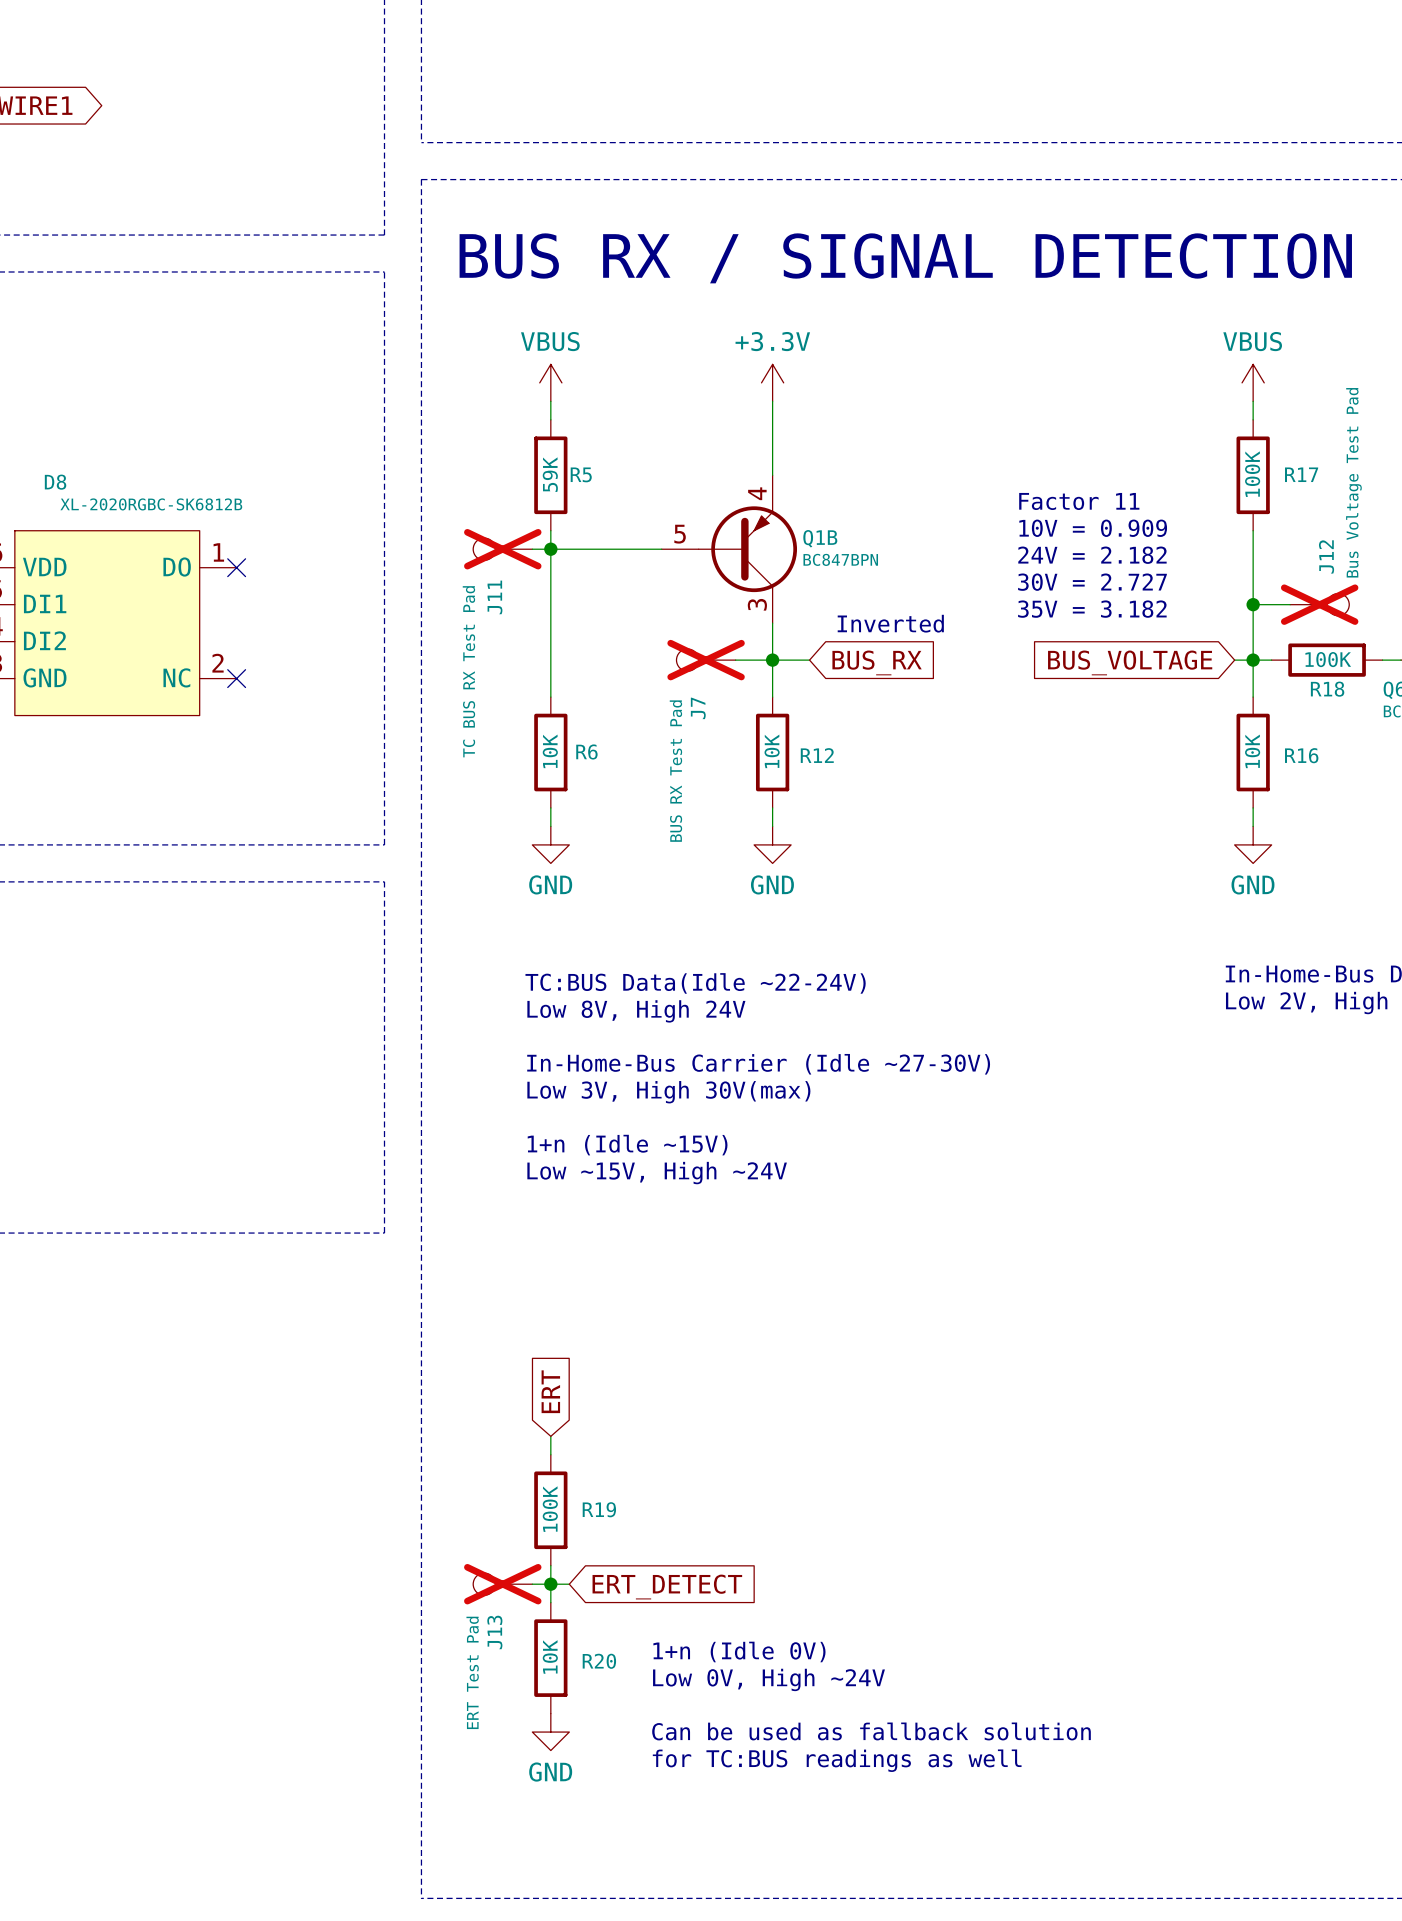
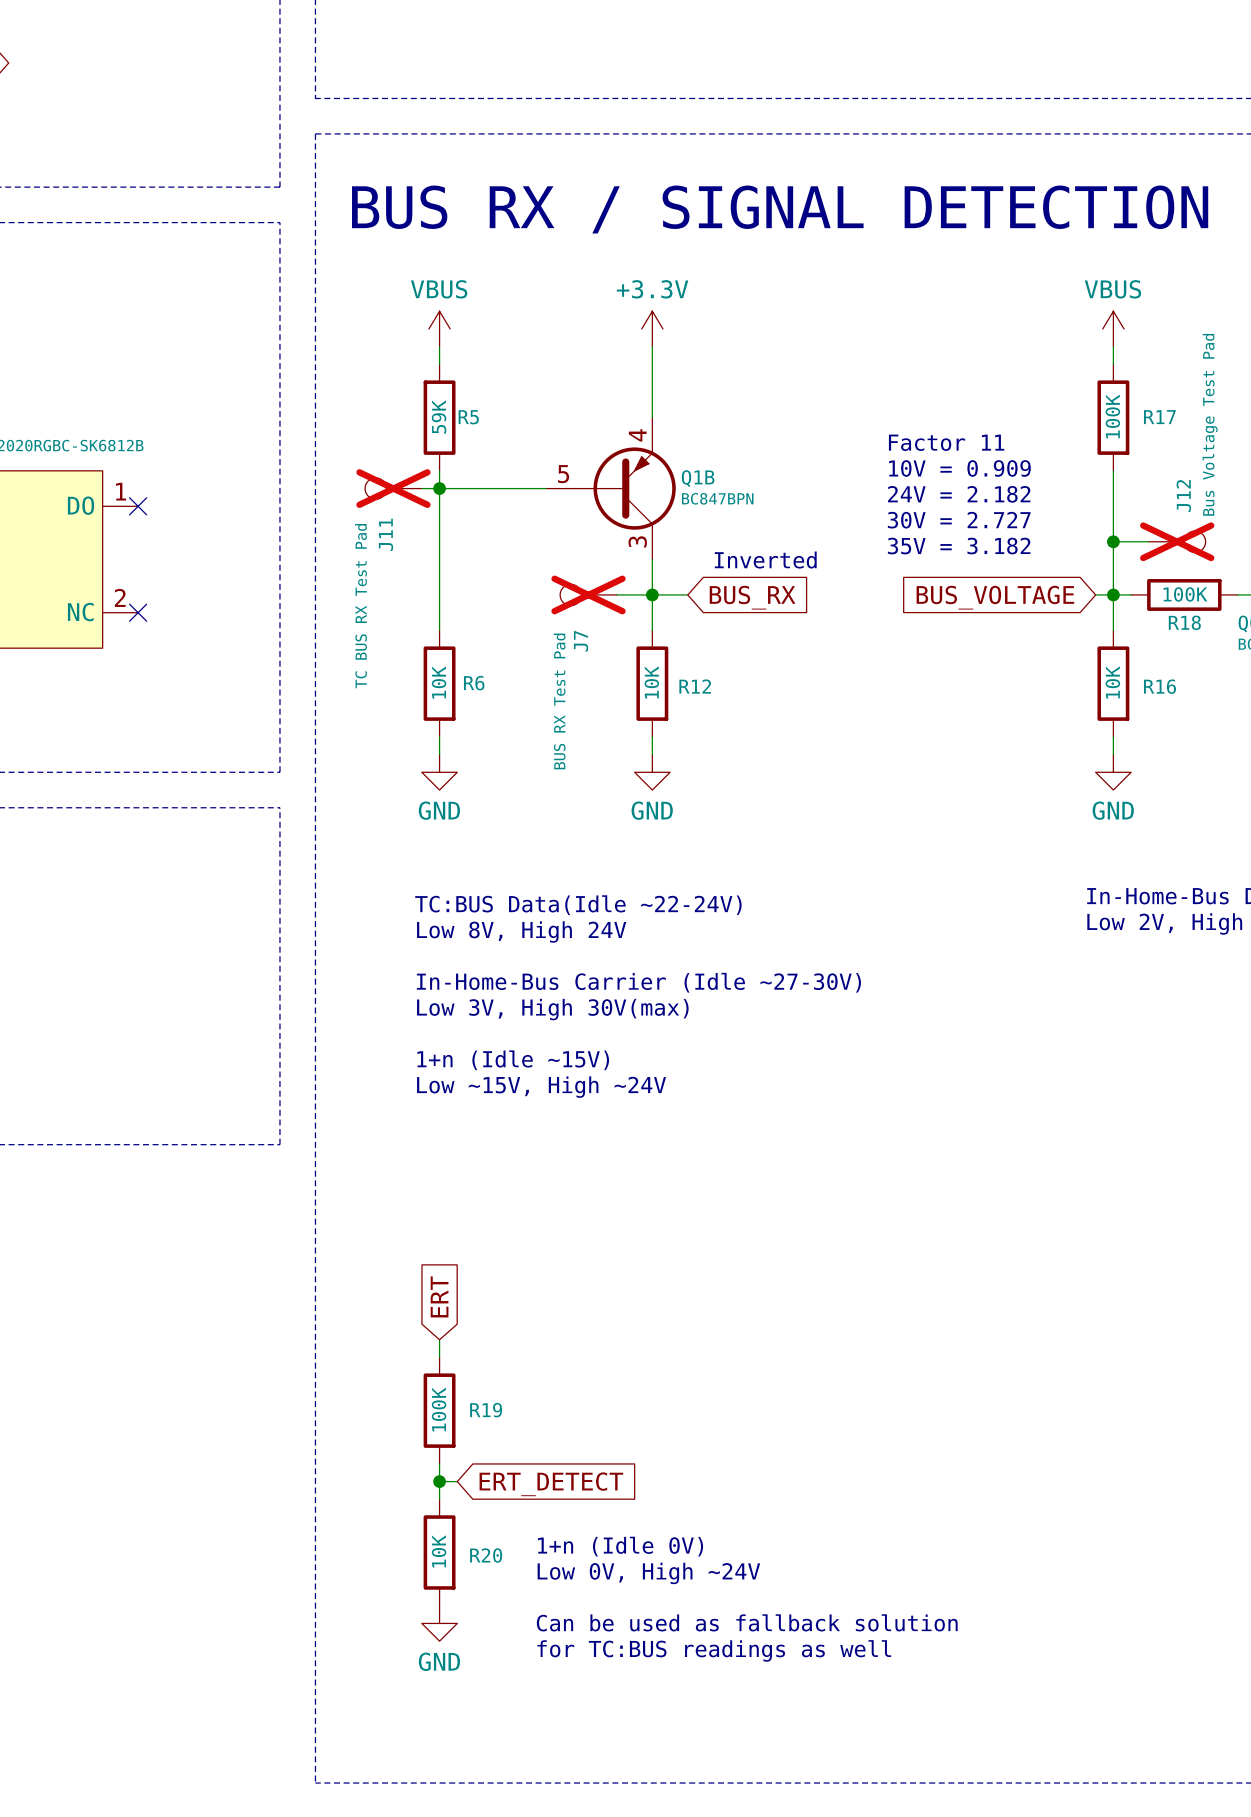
J13: ERT Test Pad (502, 1584) -> none
wire: (532, 1584) (550, 1584) -> none

